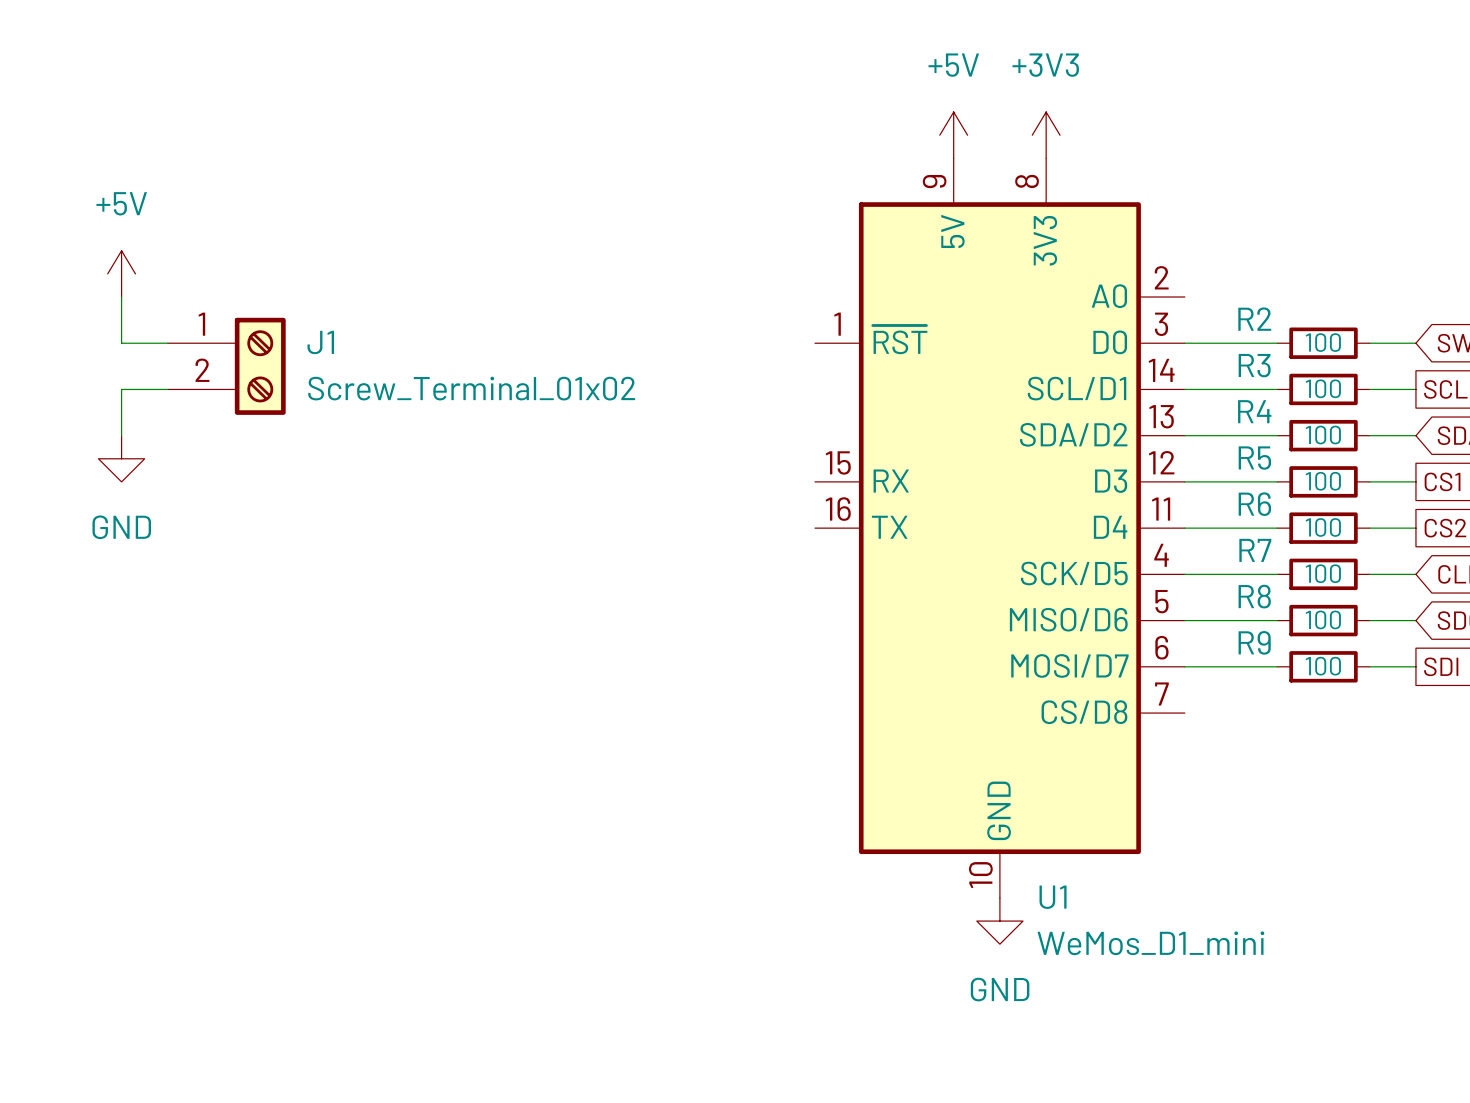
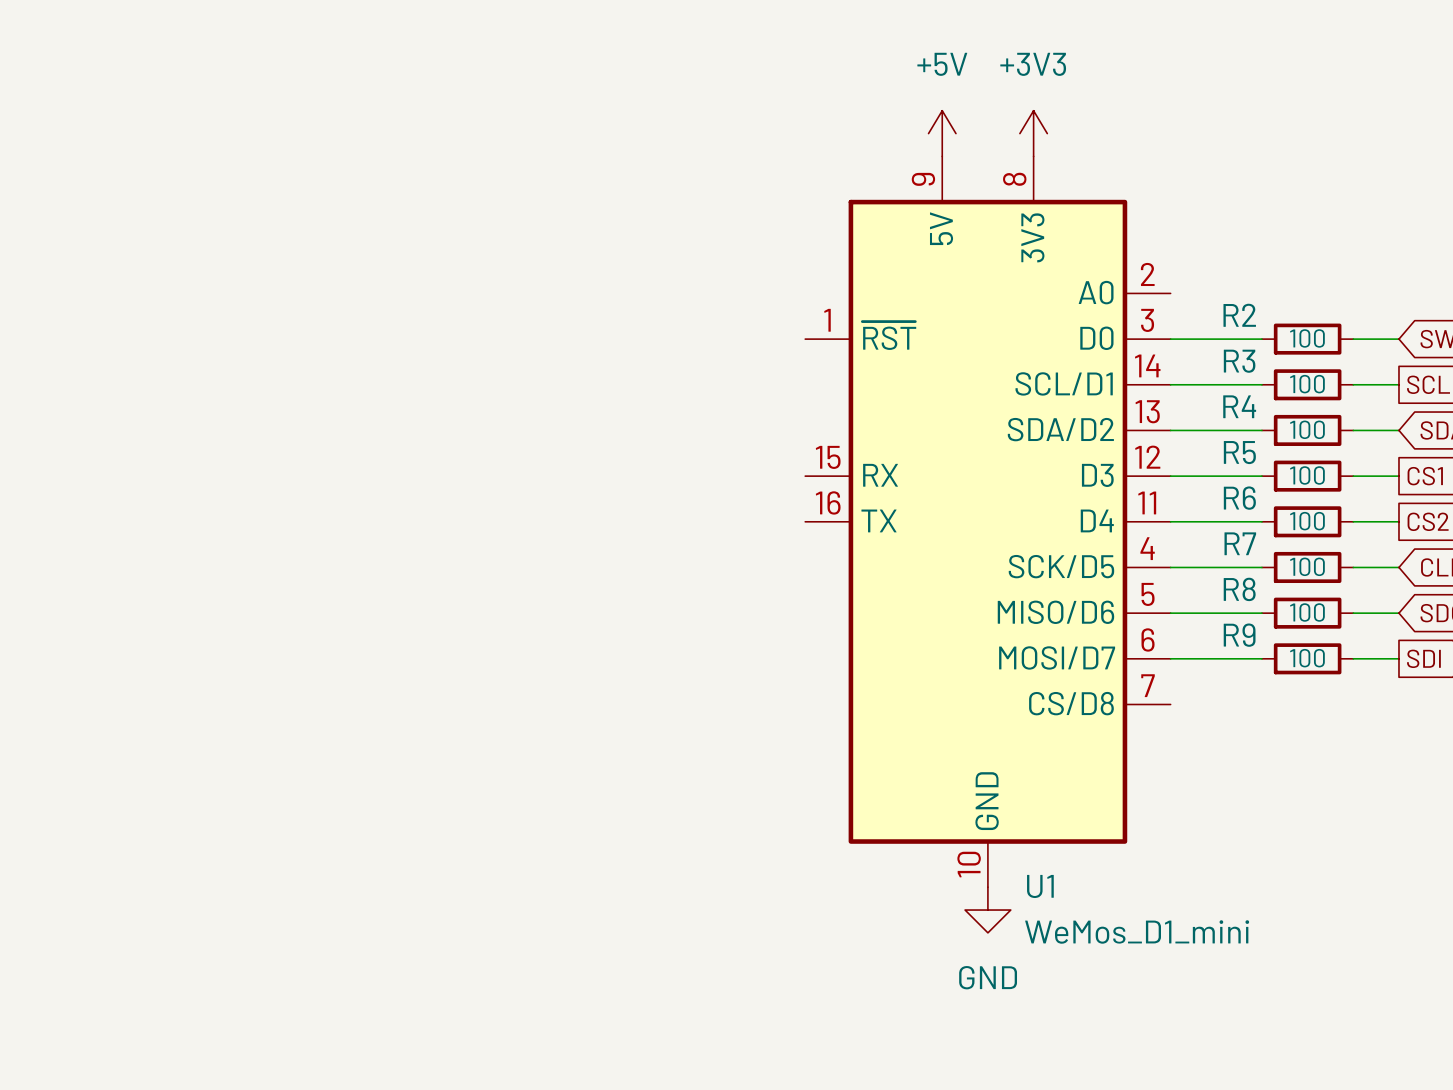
power symbol: +5V (121, 273) -> none
wire: (121, 296) (121, 343) (167, 343) -> none
J1: Screw_Terminal_01x02 (226, 366) -> none
wire: (167, 389) (121, 389) (121, 435) -> none
power symbol: GND (121, 458) -> none

